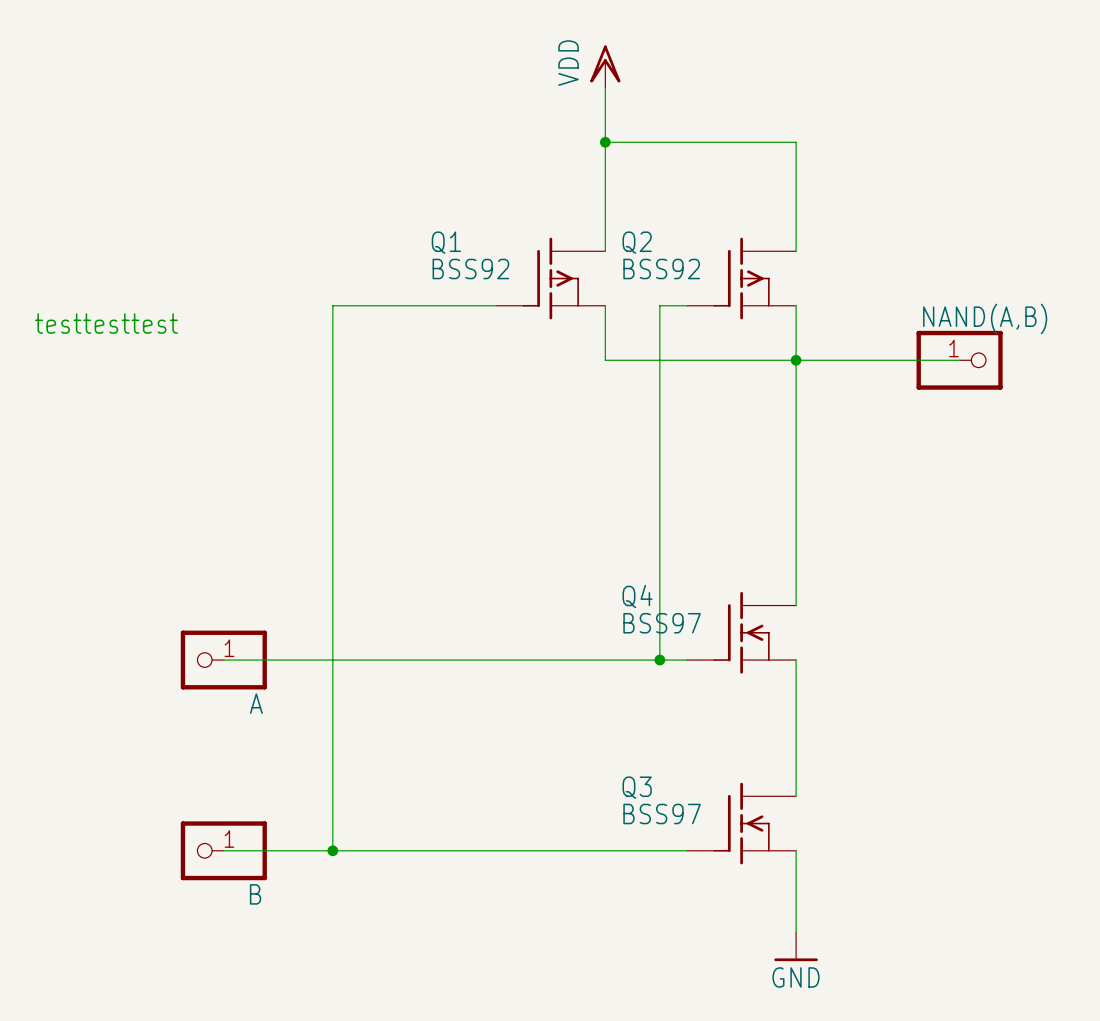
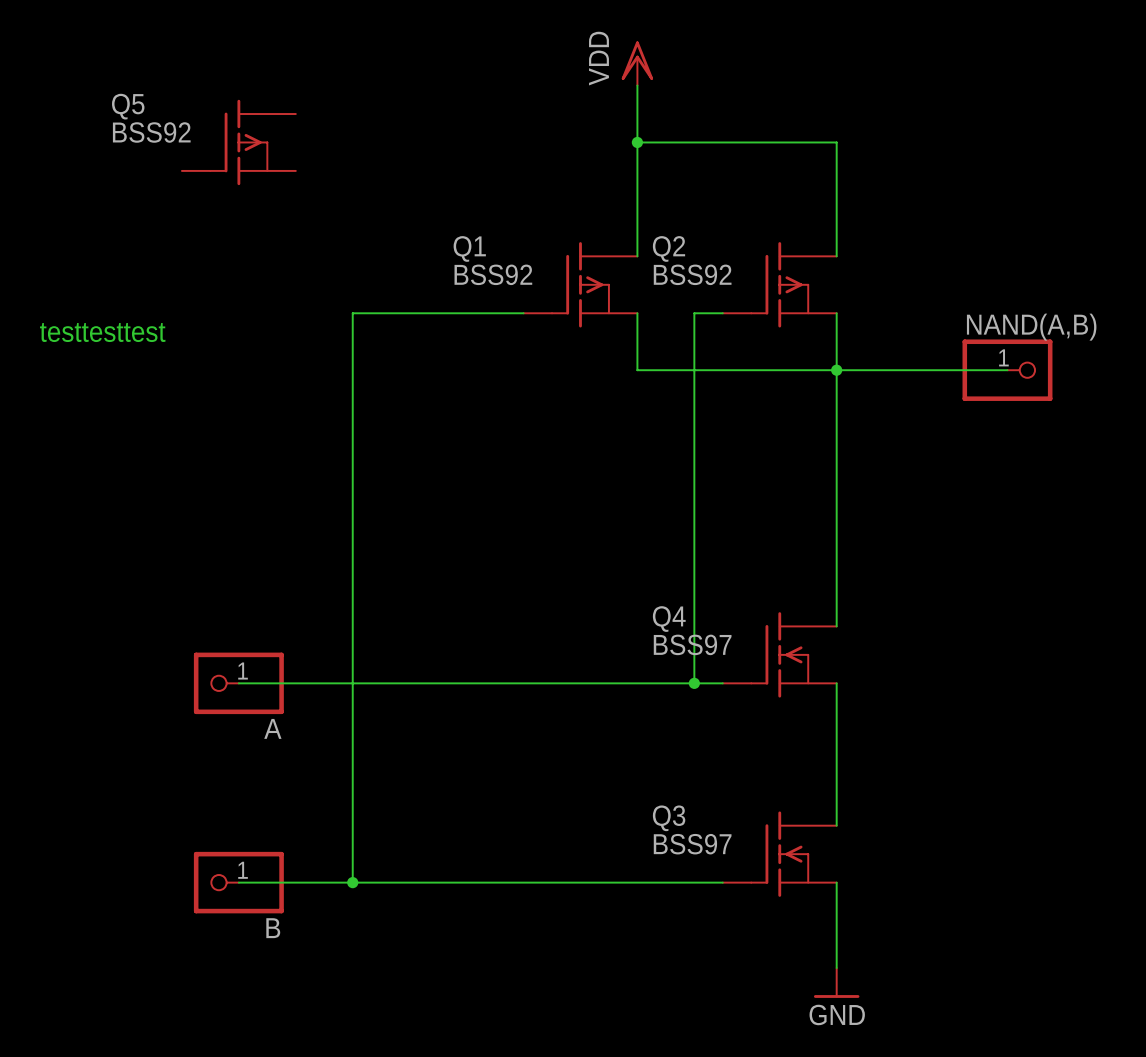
Q5: none -> BSS92 (238, 142)

